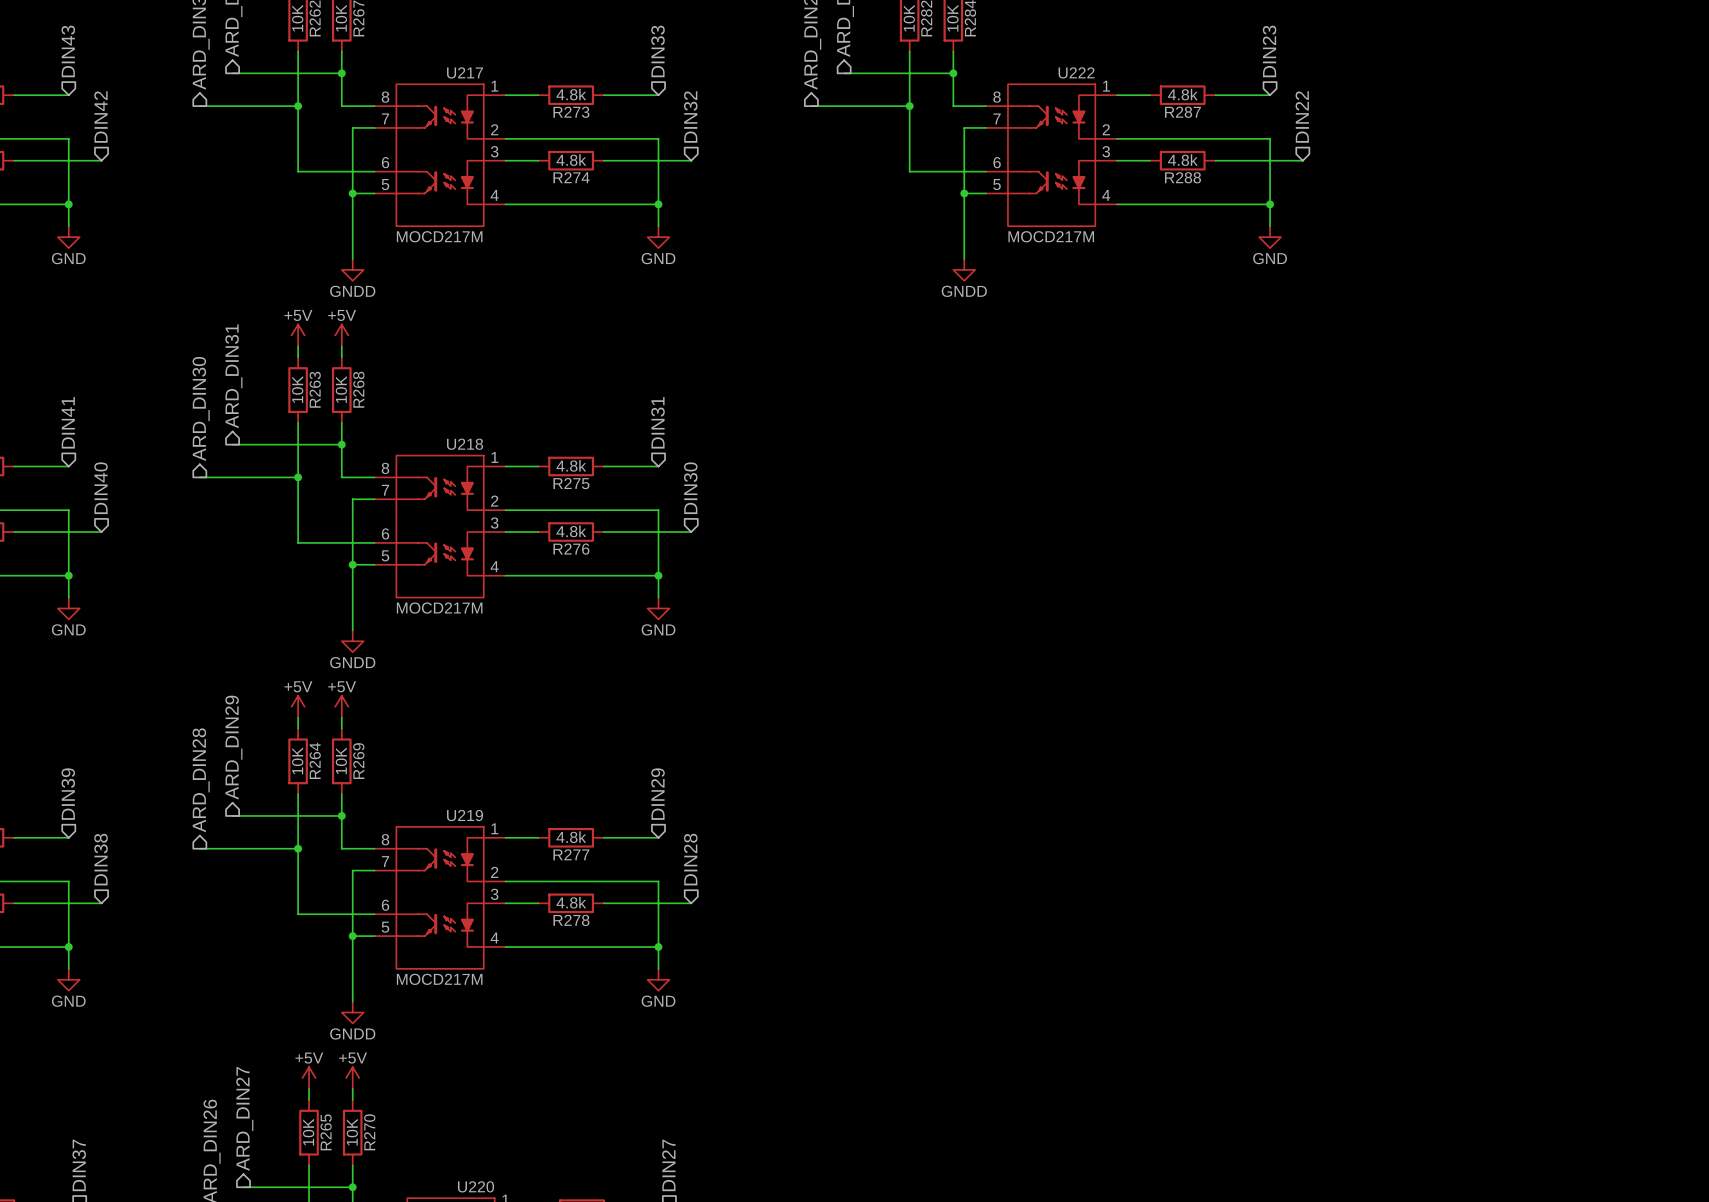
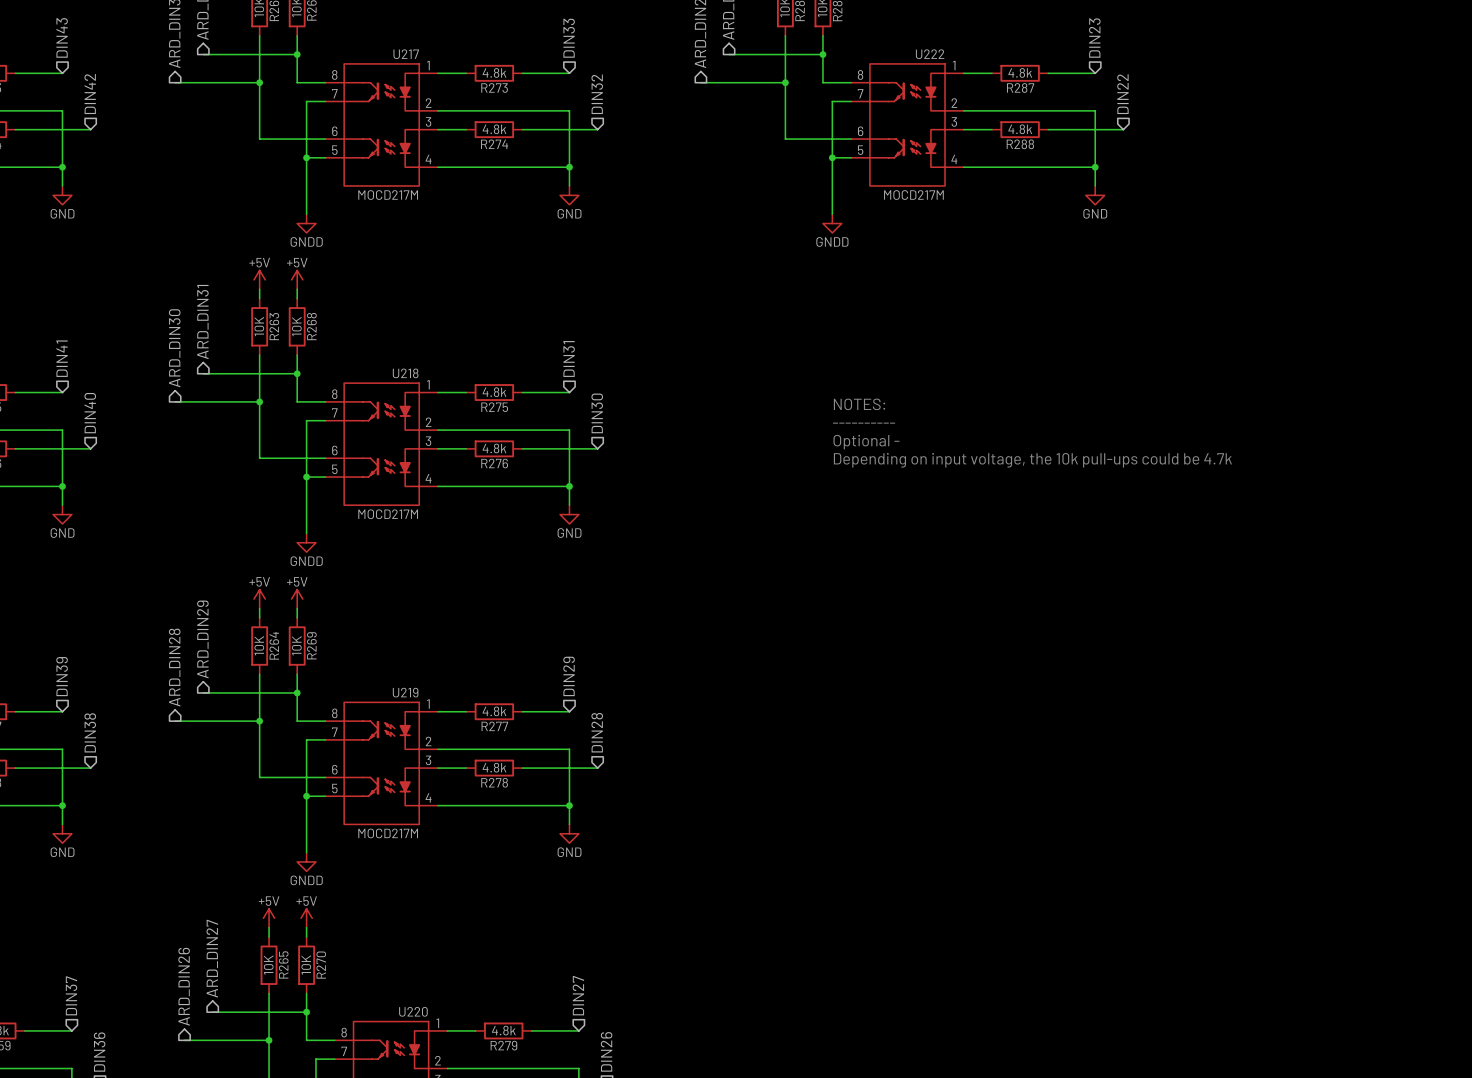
text: none -> NOTES: (859, 404)
text: none -> ---------- (864, 423)
text: none -> Optional - (866, 442)
text: none -> Depending on input voltage, the 10k pull-ups could be 4.7k (1032, 460)

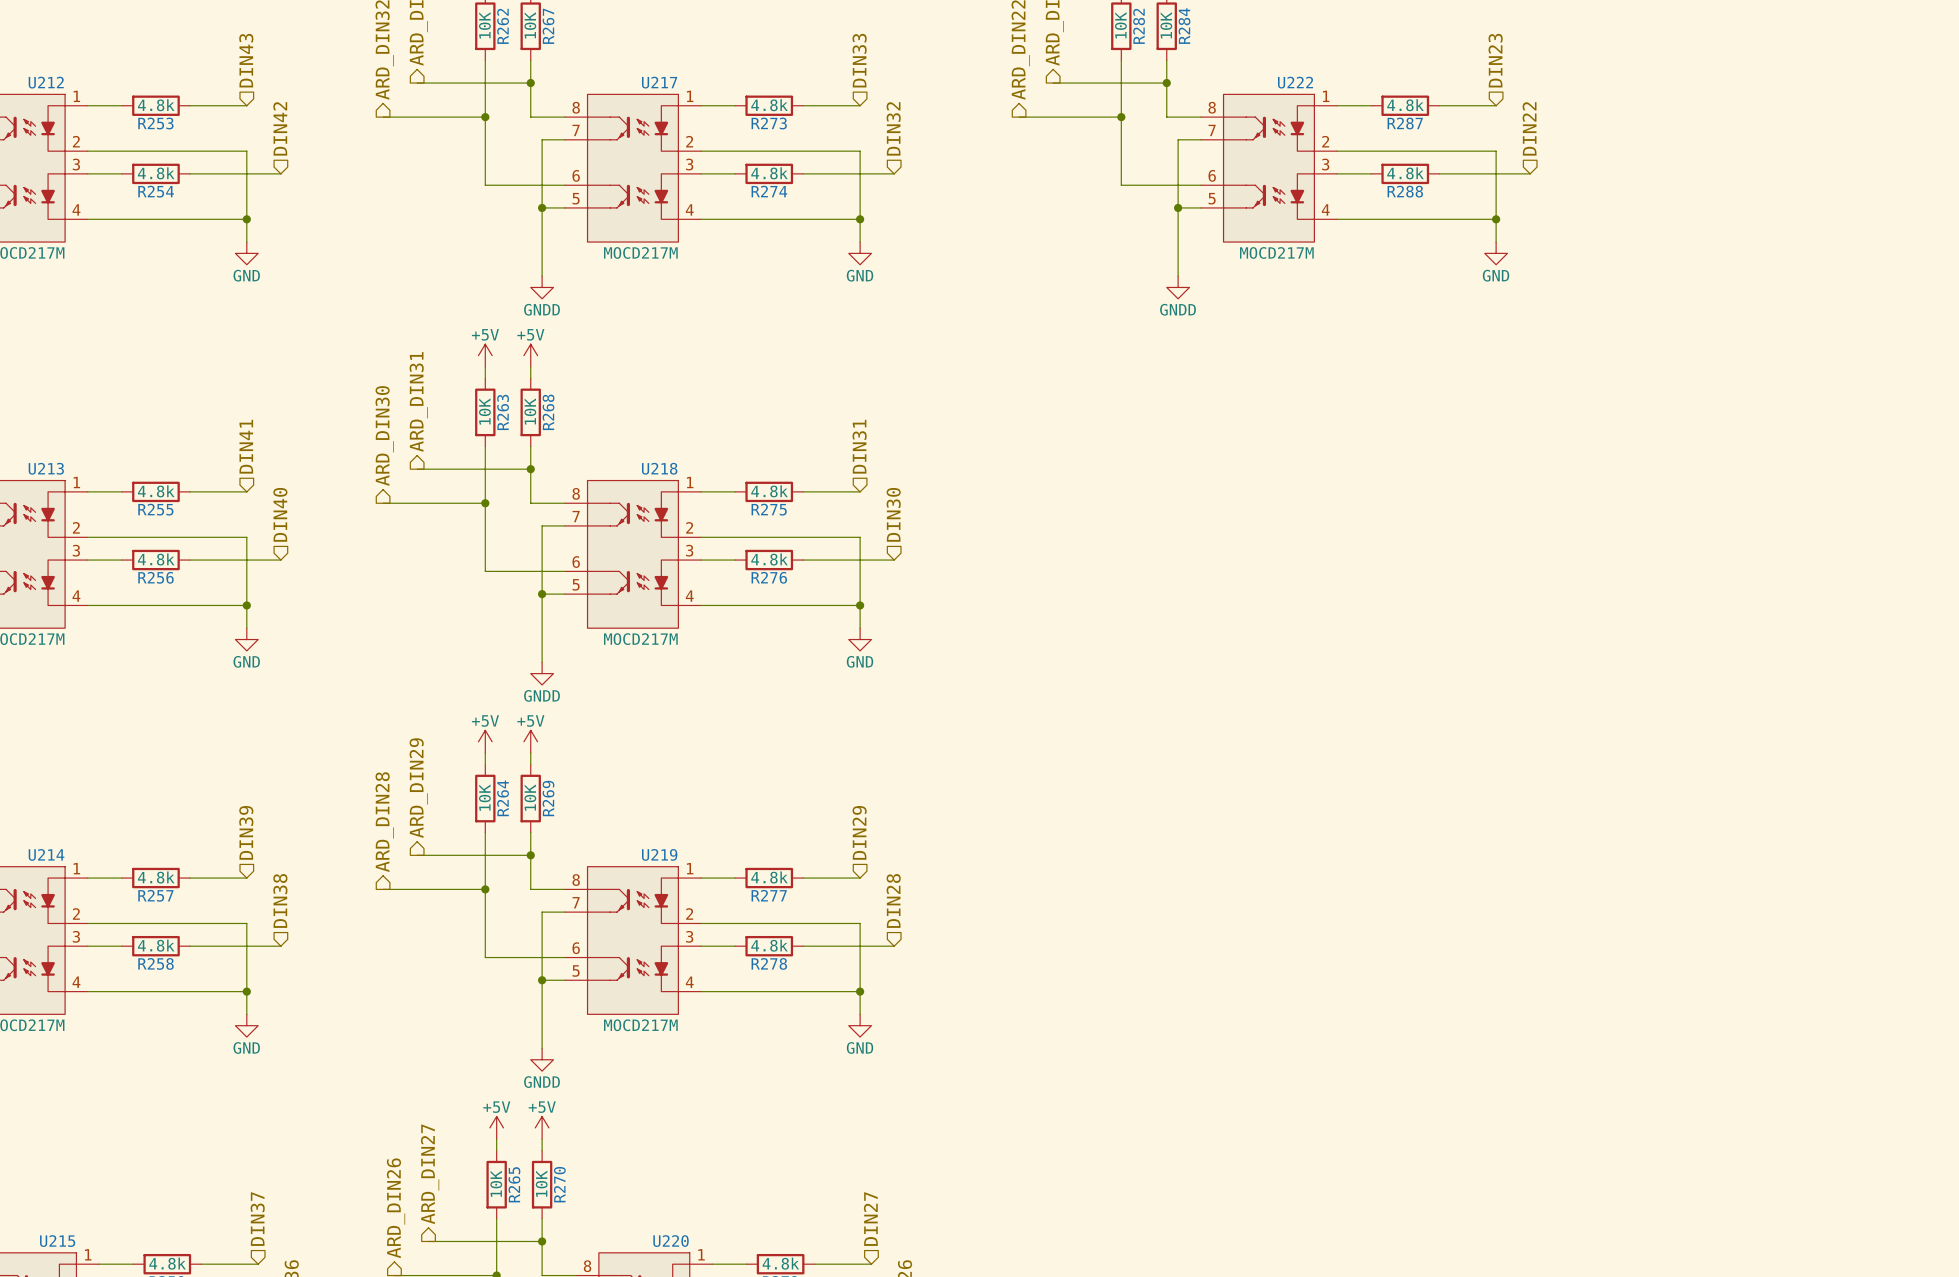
text: NOTES: (859, 404) -> none
text: ---------- (864, 423) -> none
text: Optional - (866, 442) -> none
text: Depending on input voltage, the 10k pull-ups could be 4.7k (1032, 460) -> none

